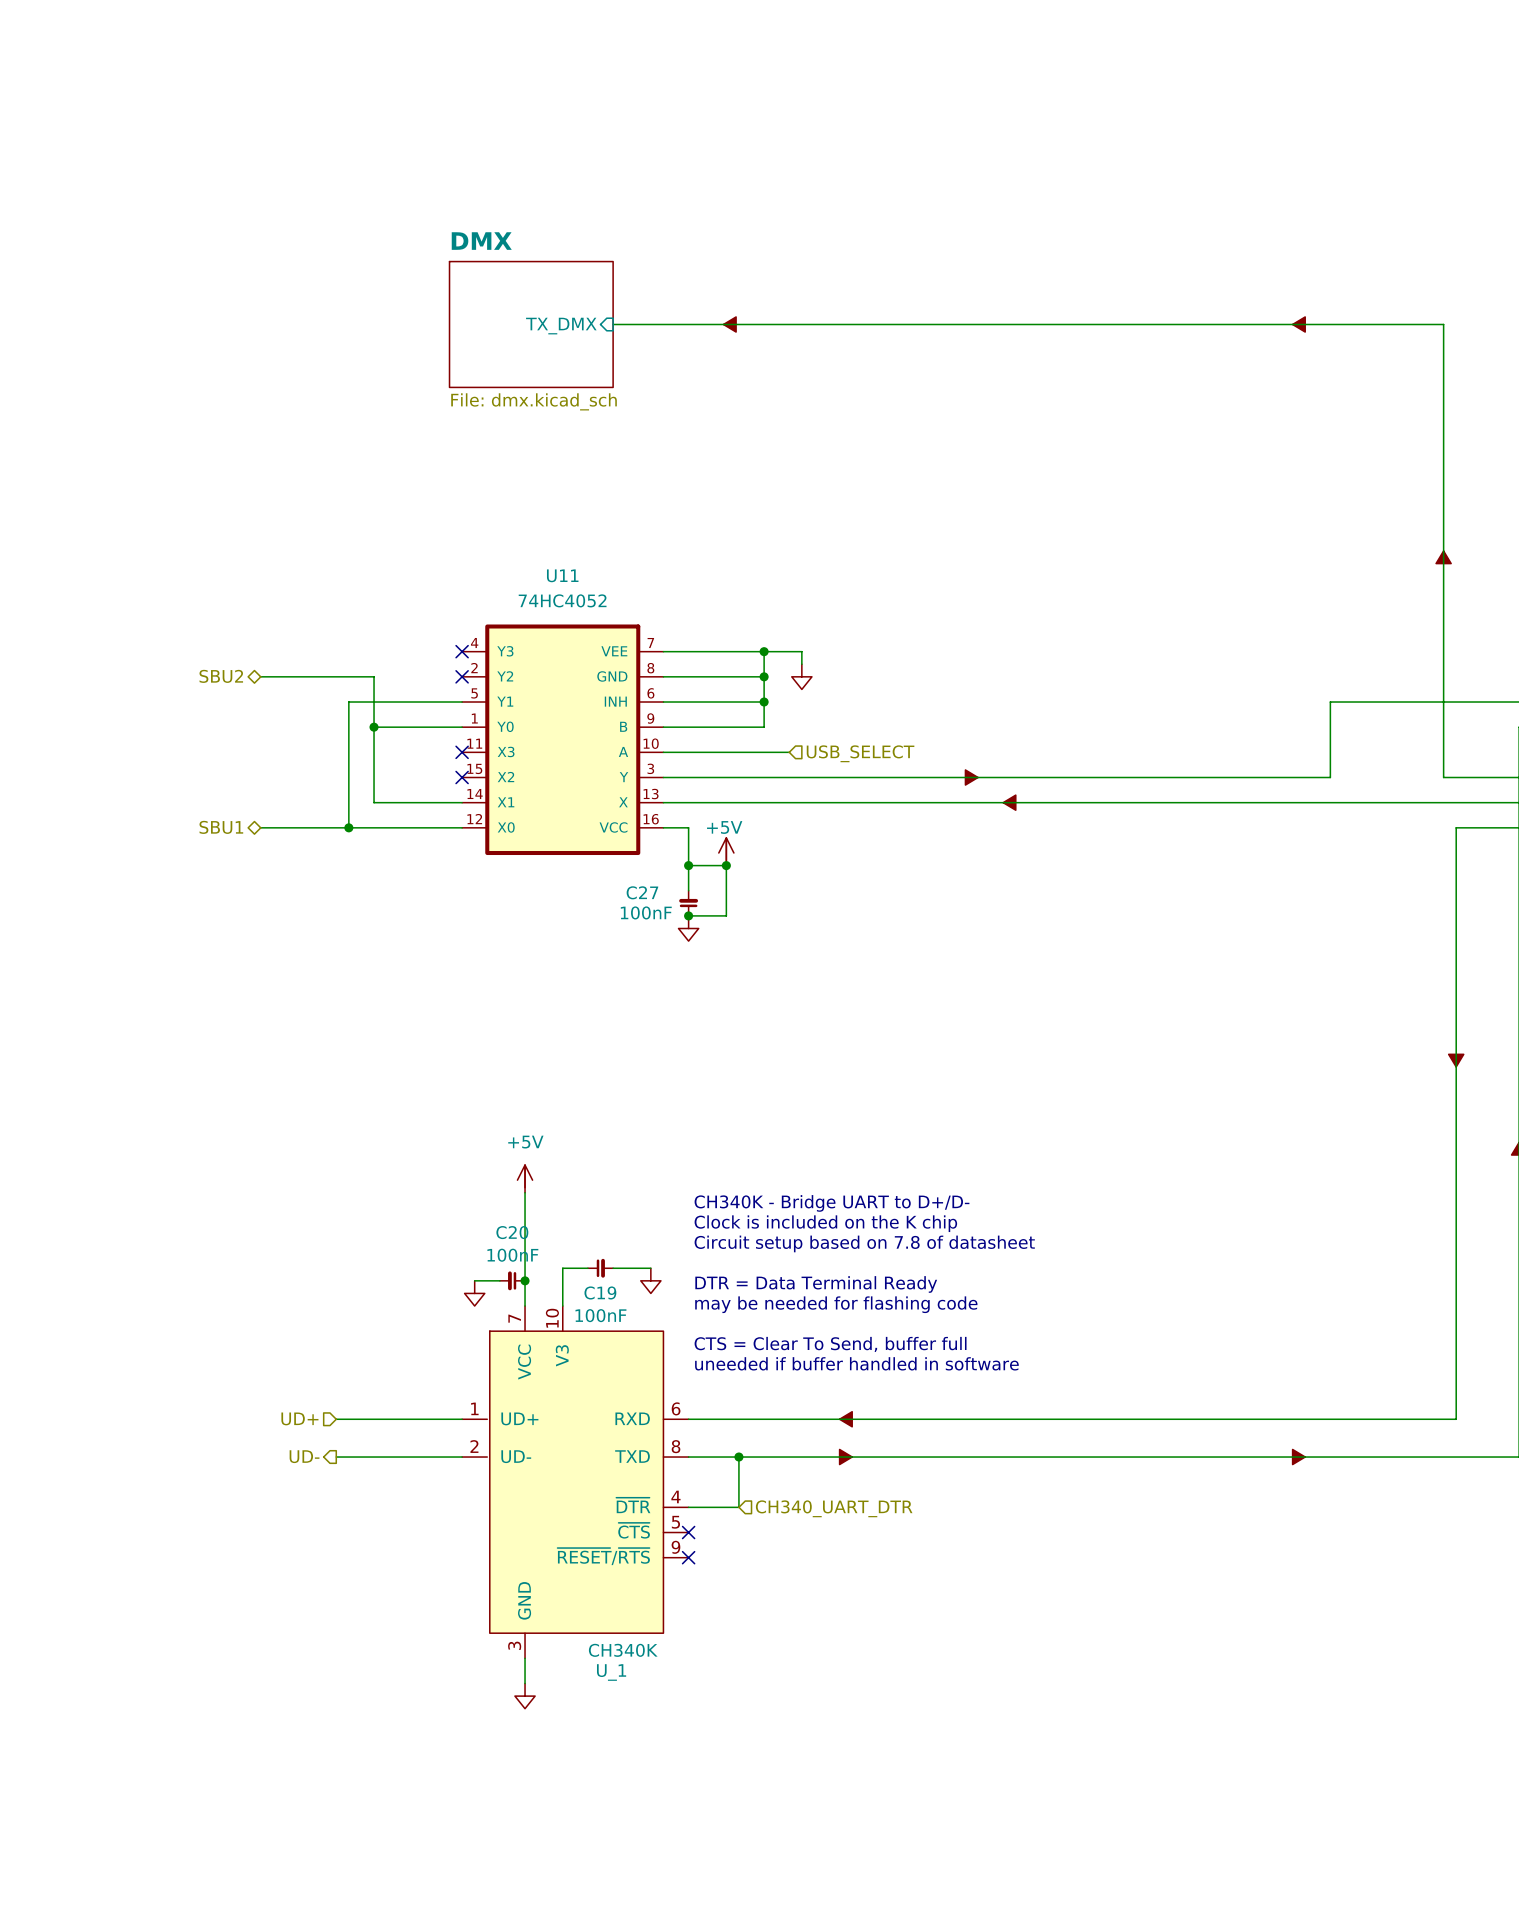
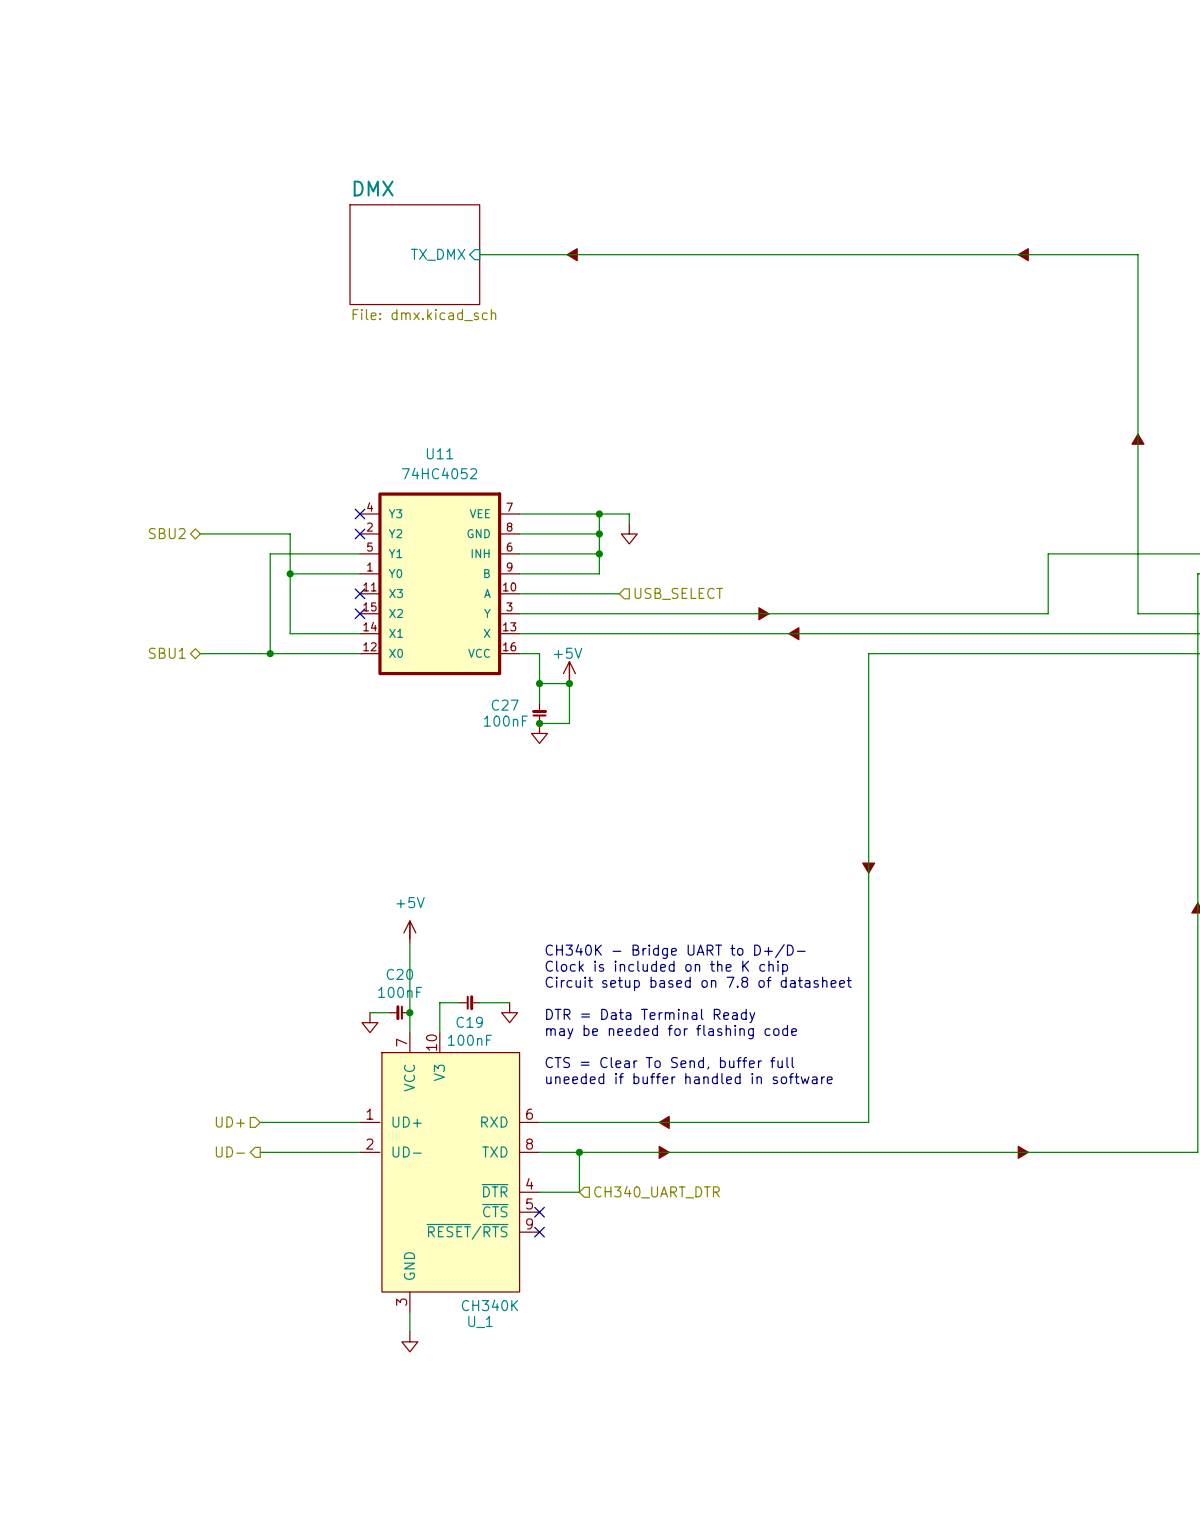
wire: (1456, 827) (1456, 1419) (1103, 1419) -> (1147, 653) (868, 653) (868, 1122)
part: (1456, 1060) -> none
part: none -> (868, 868)

